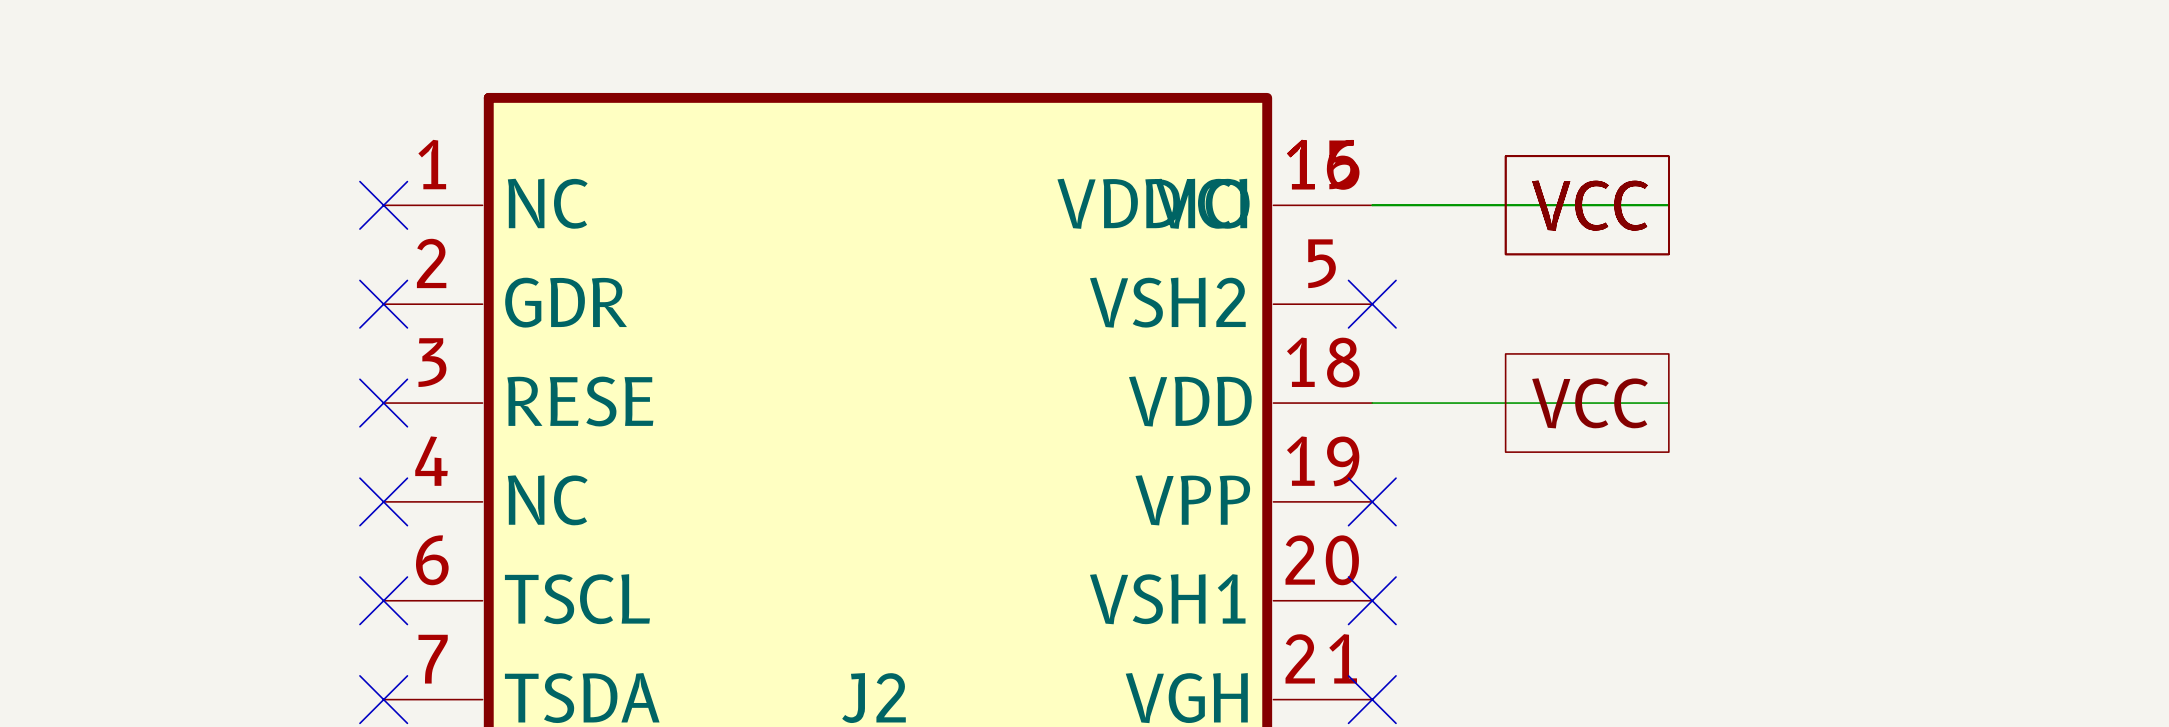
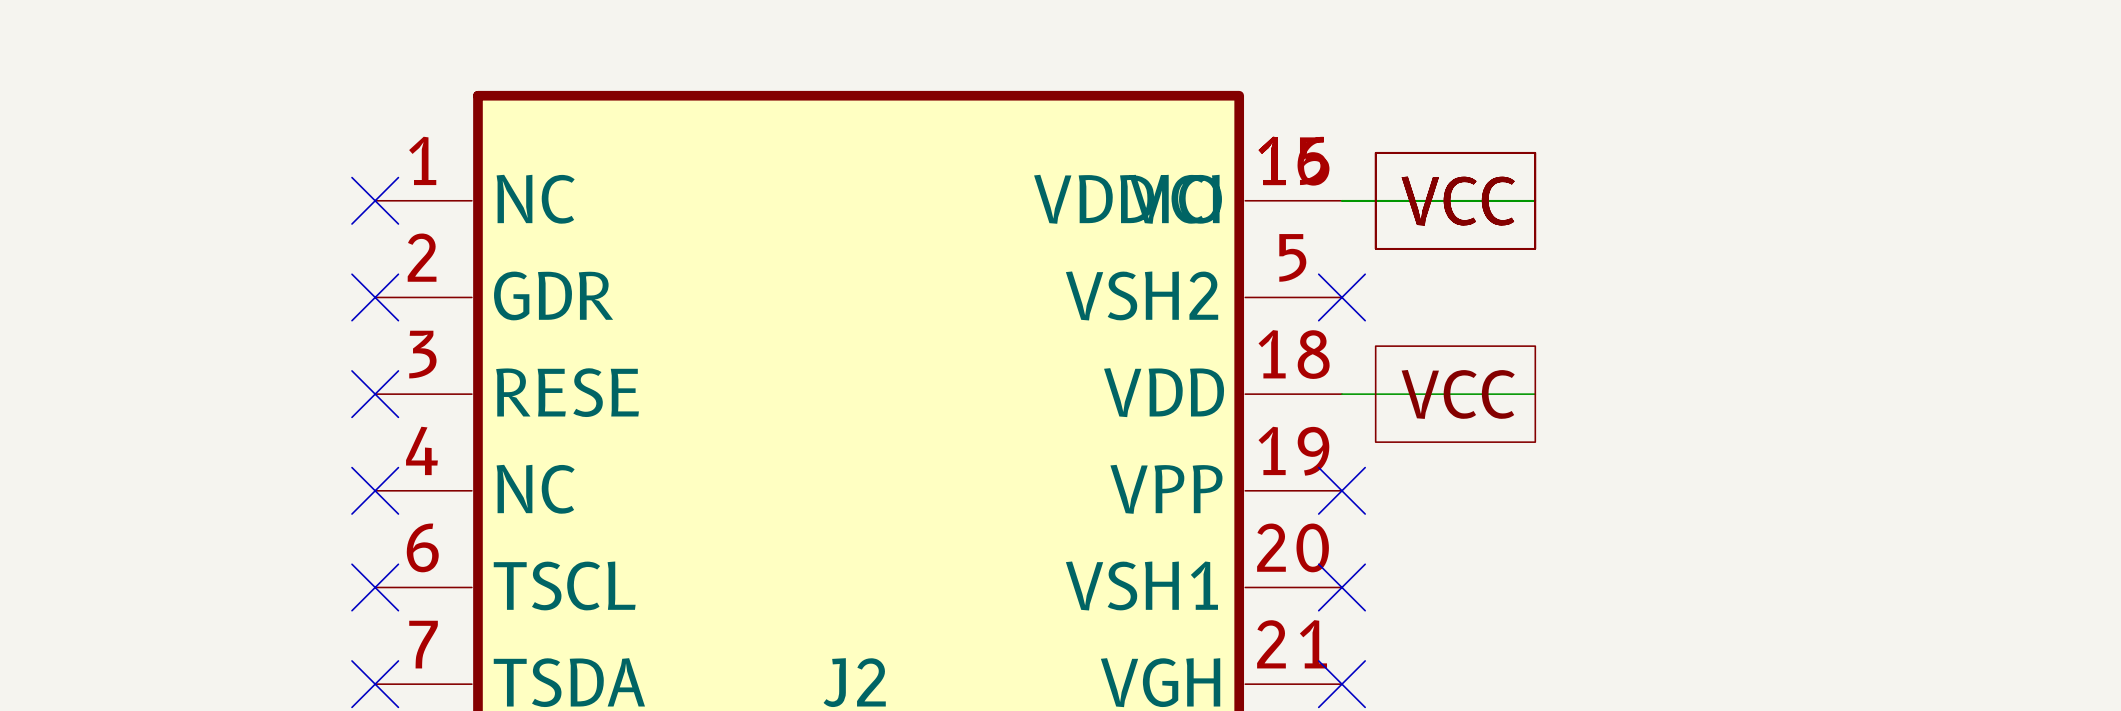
wire: (1570, 205) (1668, 205) -> none
global label position: VCC (1590, 205) -> VCC (1458, 201)
wire: (1570, 403) (1668, 403) -> none
global label position: VCC (1590, 403) -> VCC (1458, 394)

